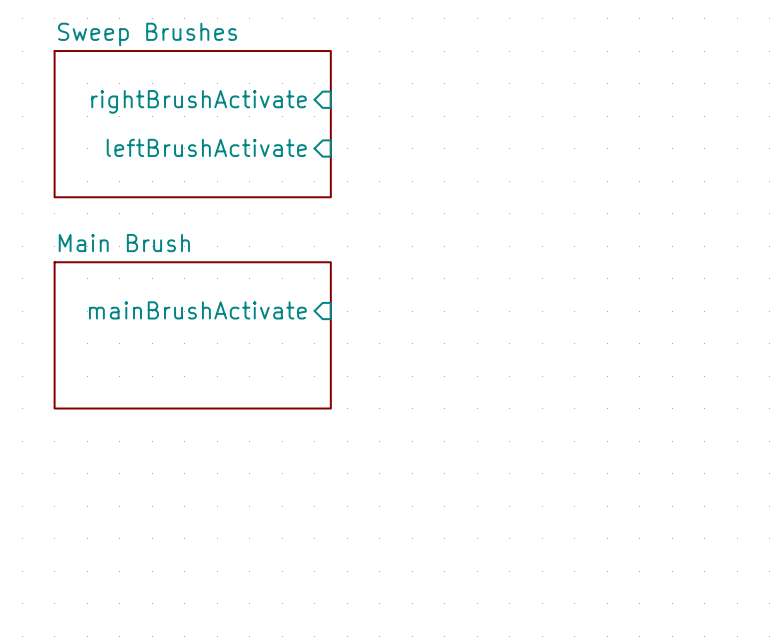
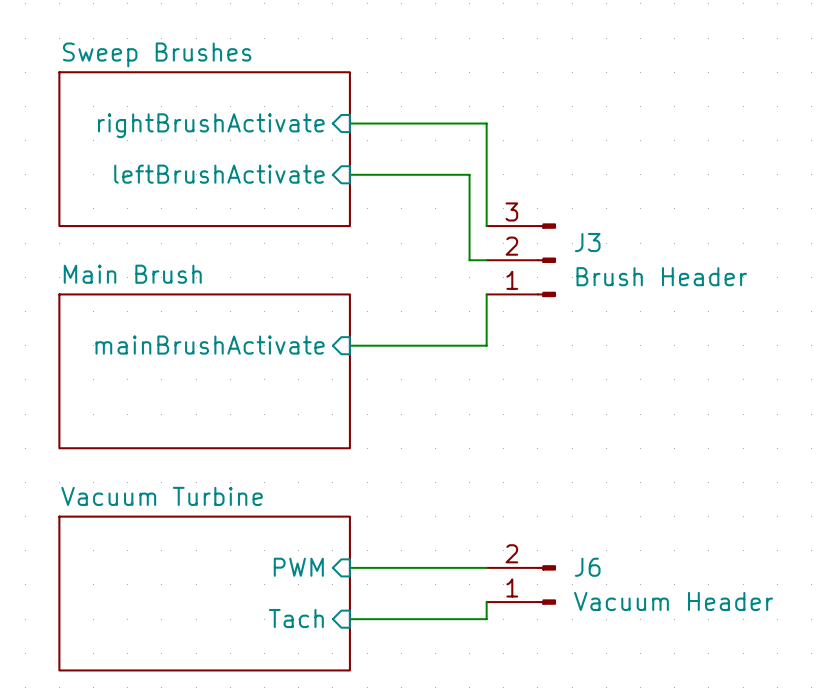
wire: none -> (349, 123) (486, 123) (486, 226)
wire: none -> (349, 174) (469, 174) (469, 260) (486, 260)
J3: none -> Brush Header (521, 260)
wire: none -> (486, 294) (486, 345) (349, 345)
sheet pin: none -> PWM (298, 567)
wire: none -> (349, 567) (486, 567)
J6: none -> Vacuum Header (521, 584)
sheet Vacuum Turbine: none -> (204, 593)
wire: none -> (486, 602) (486, 619) (349, 619)
sheet pin: none -> Tach (296, 618)

